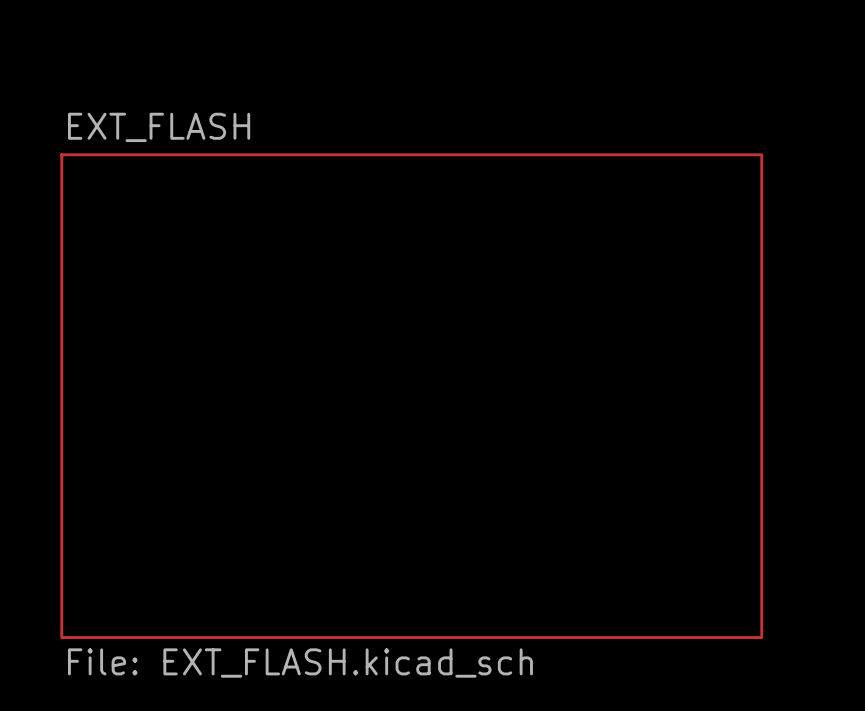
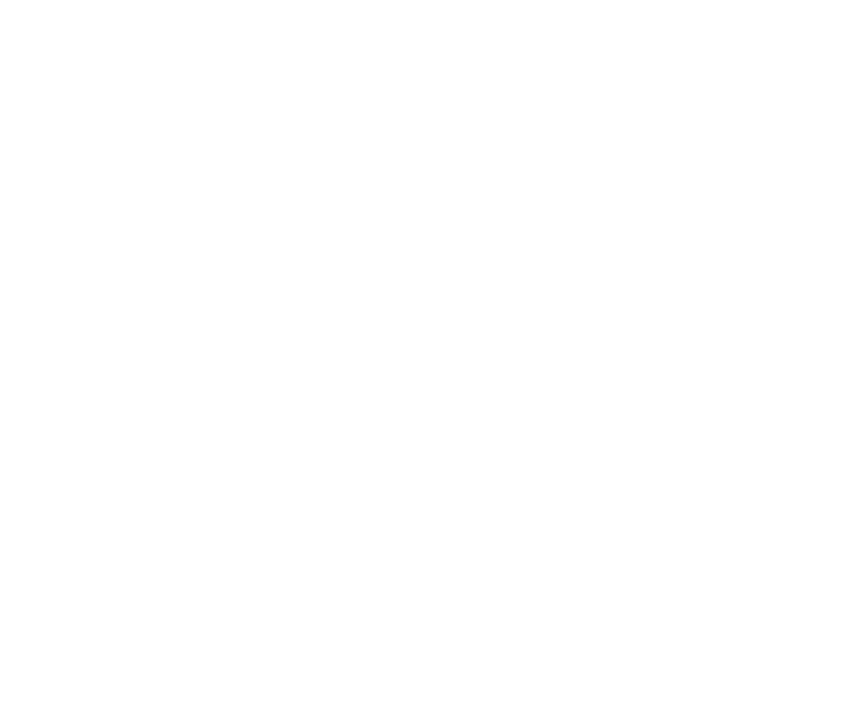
sheet EXT_FLASH: File: EXT_FLASH.kicad_sch (411, 396) -> none

